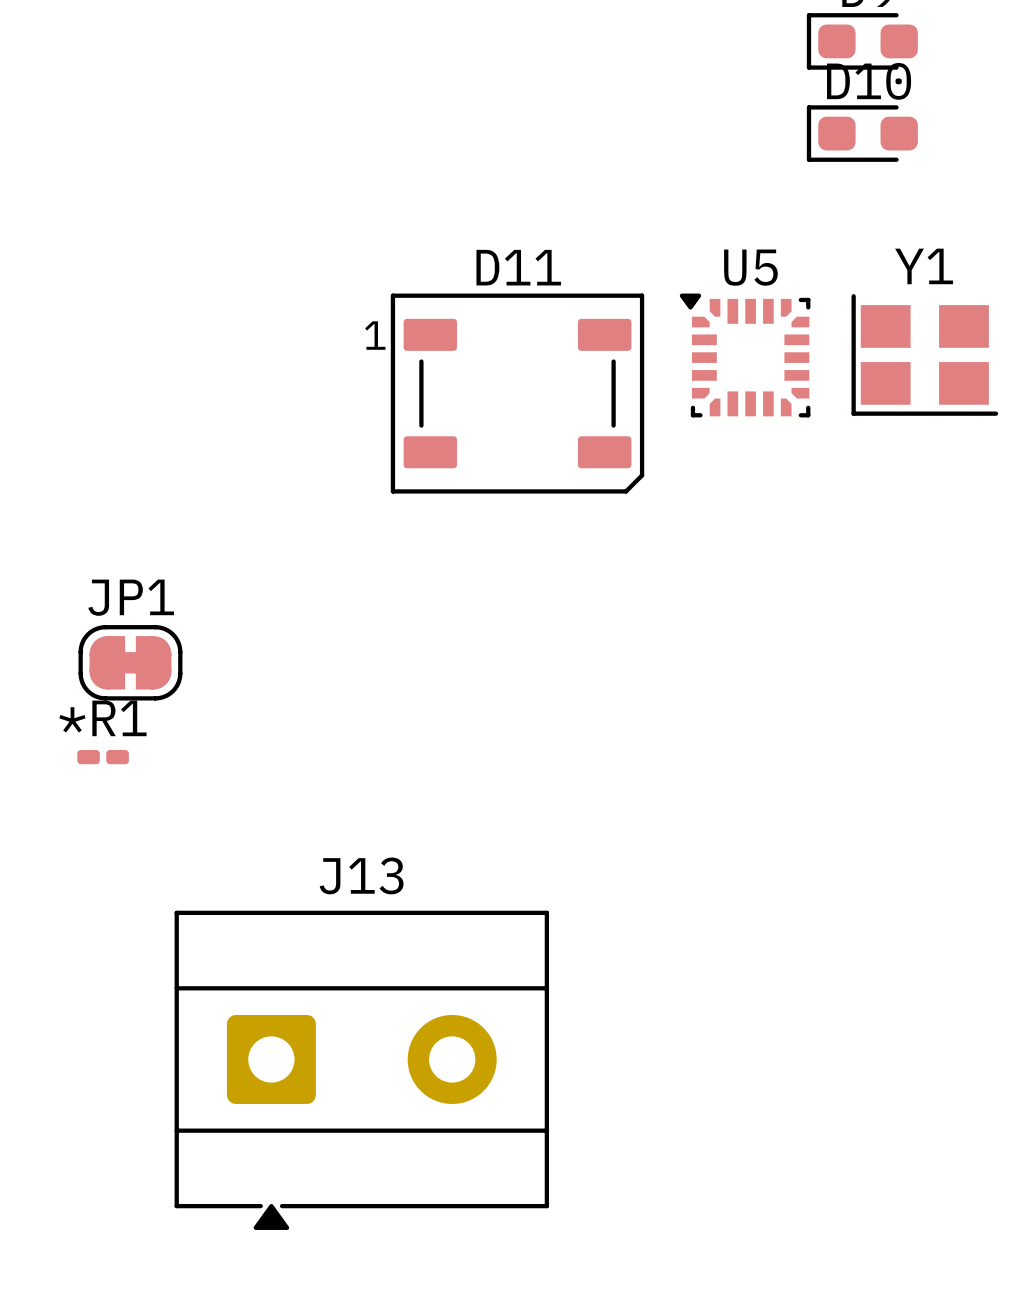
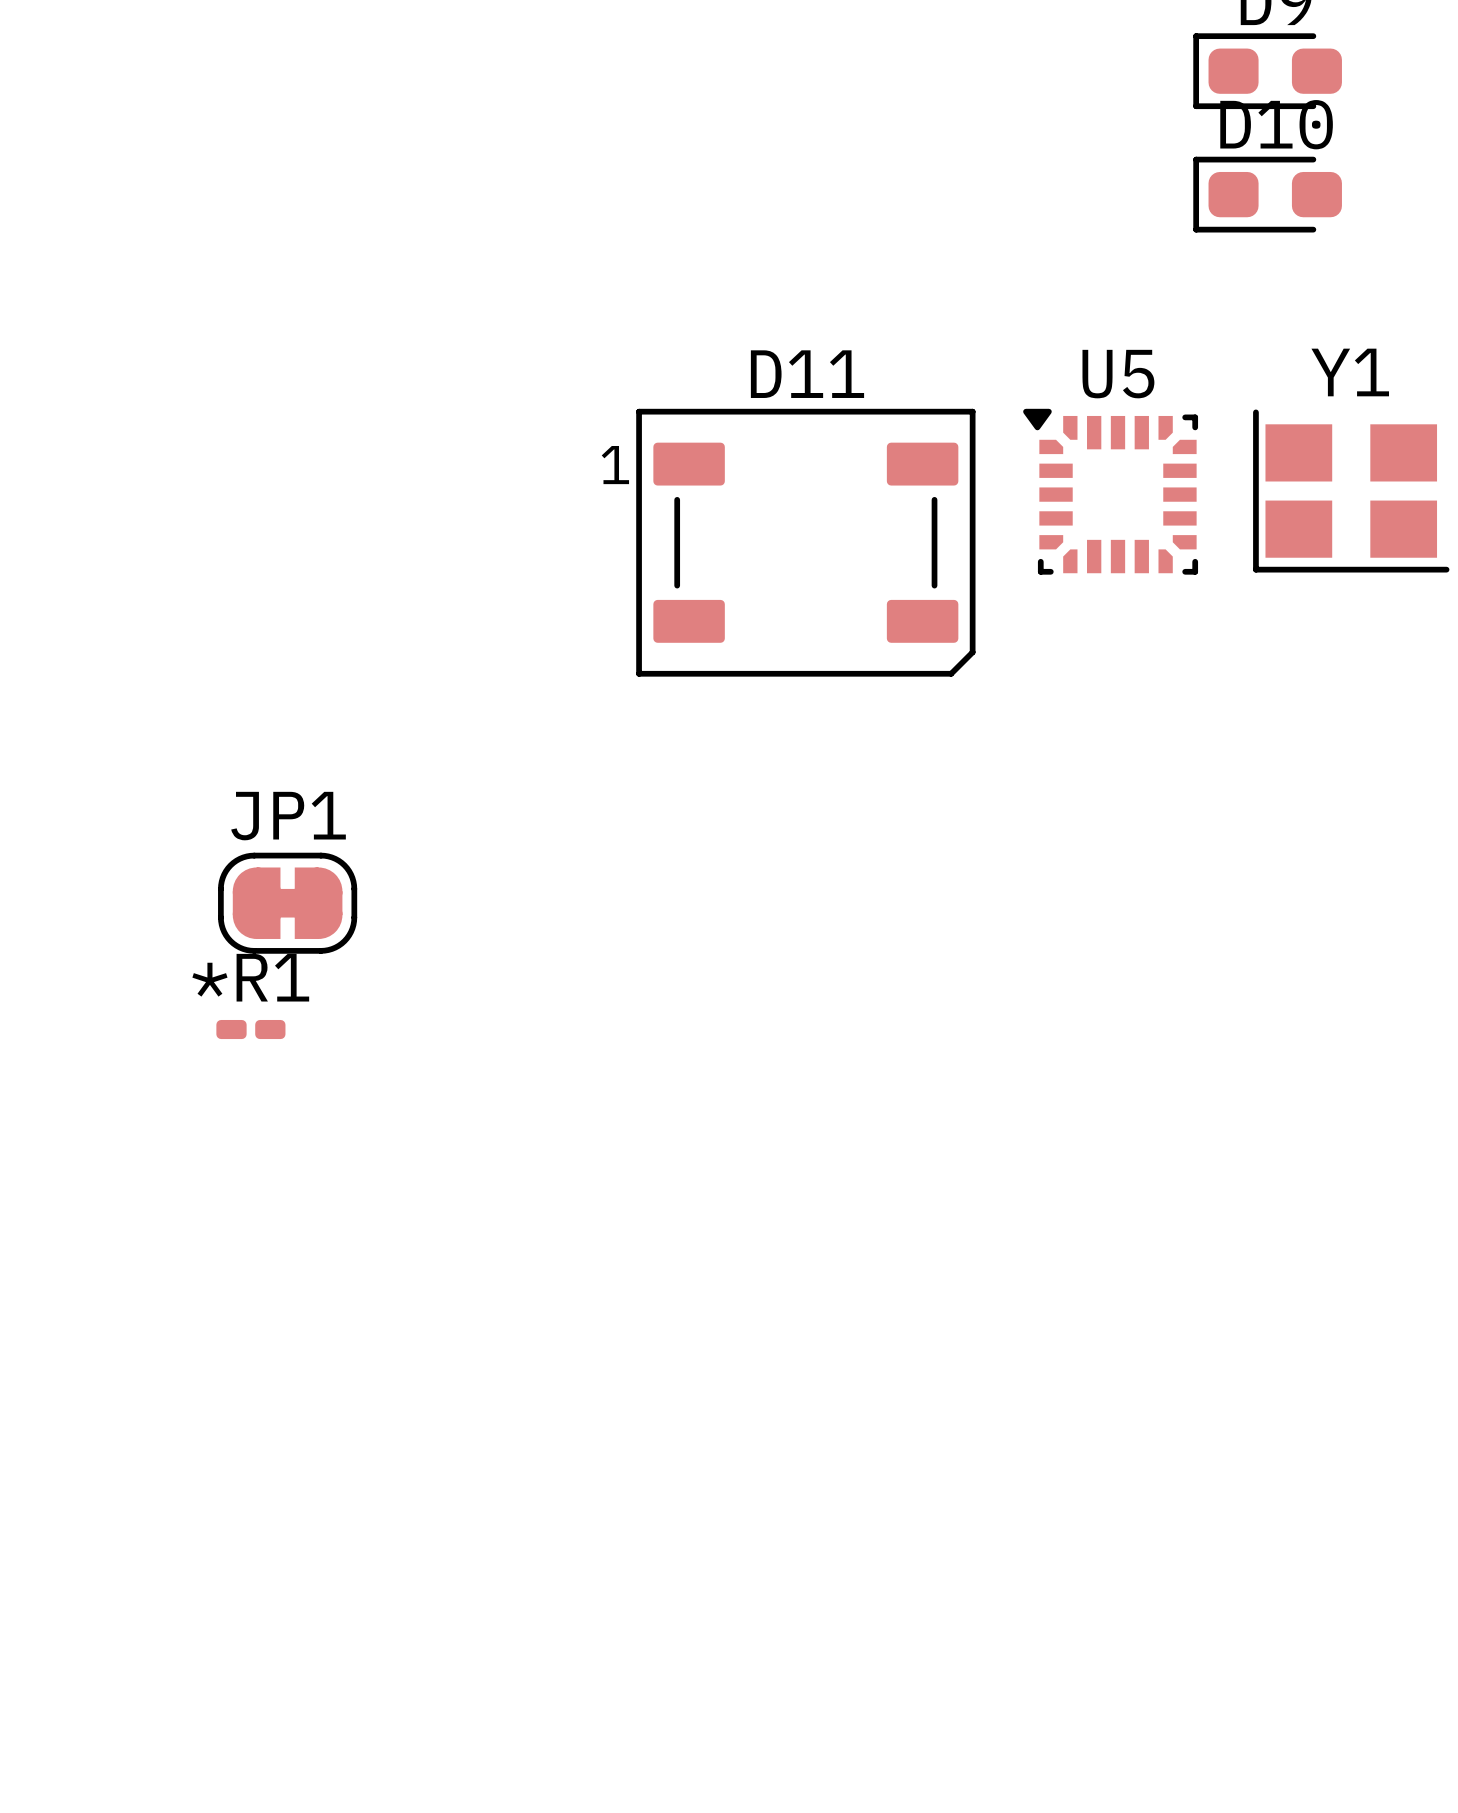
J13: (361, 1070) -> none

